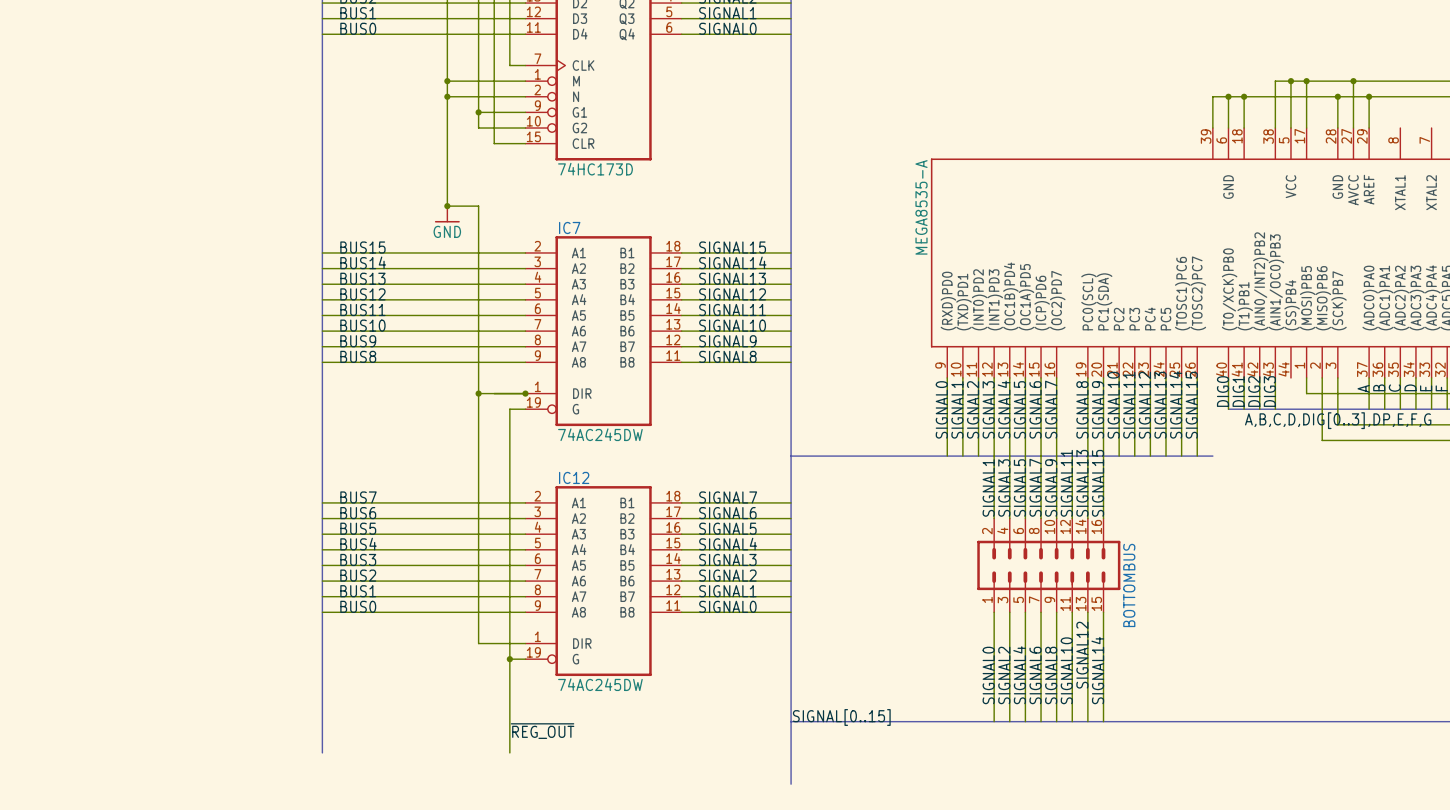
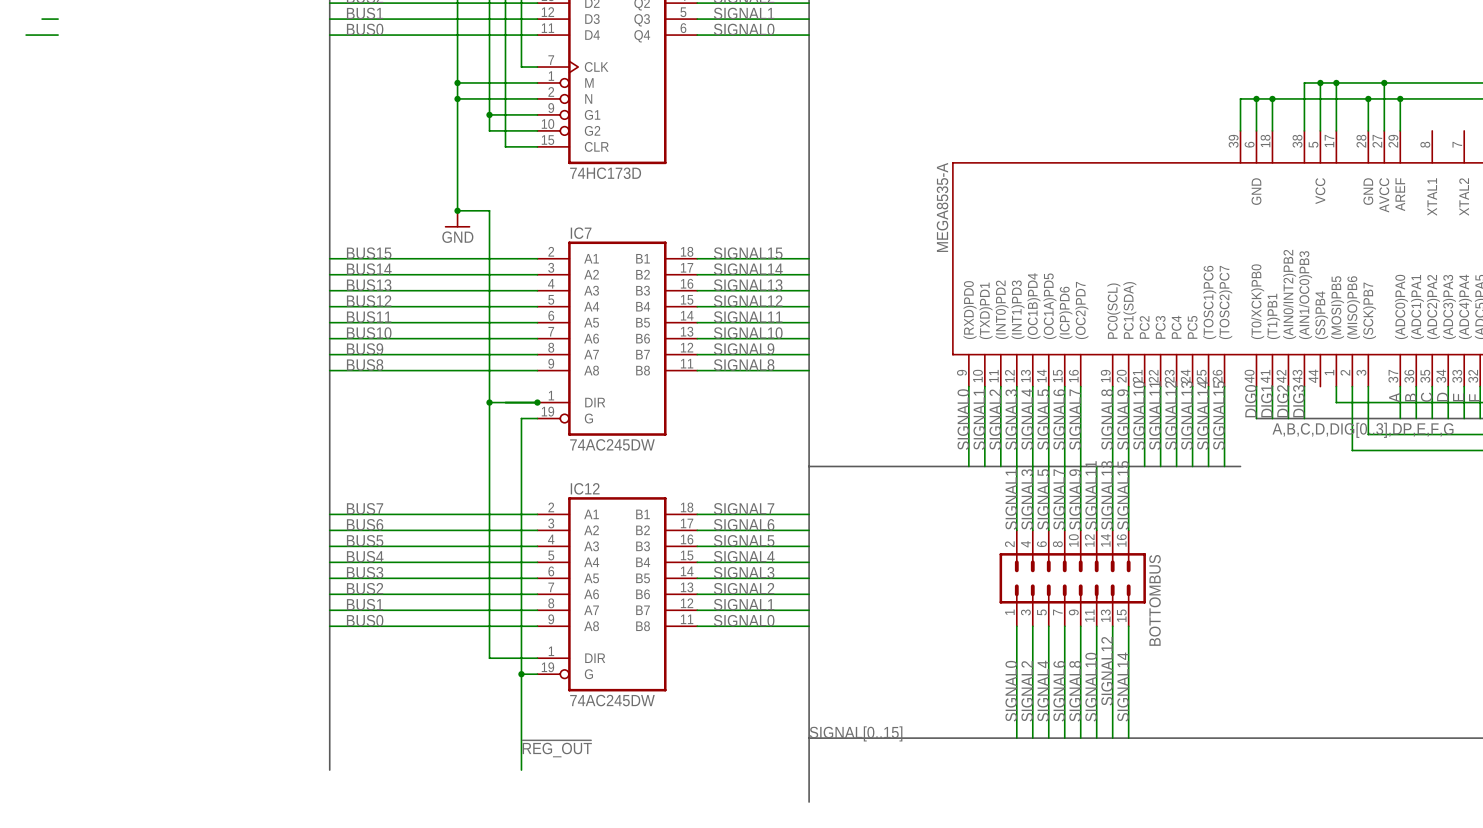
wire: none -> (42, 19) (58, 19)
wire: none -> (26, 35) (58, 35)

